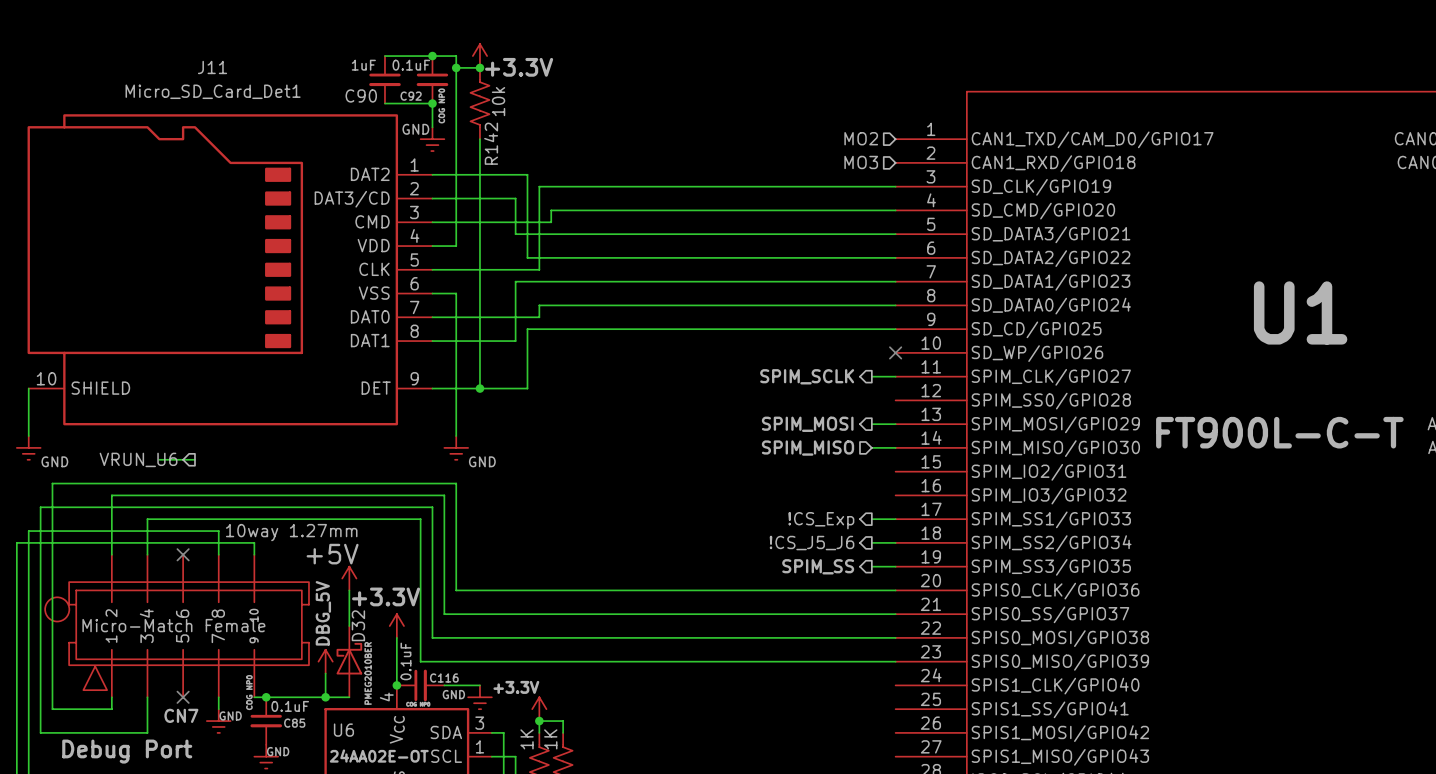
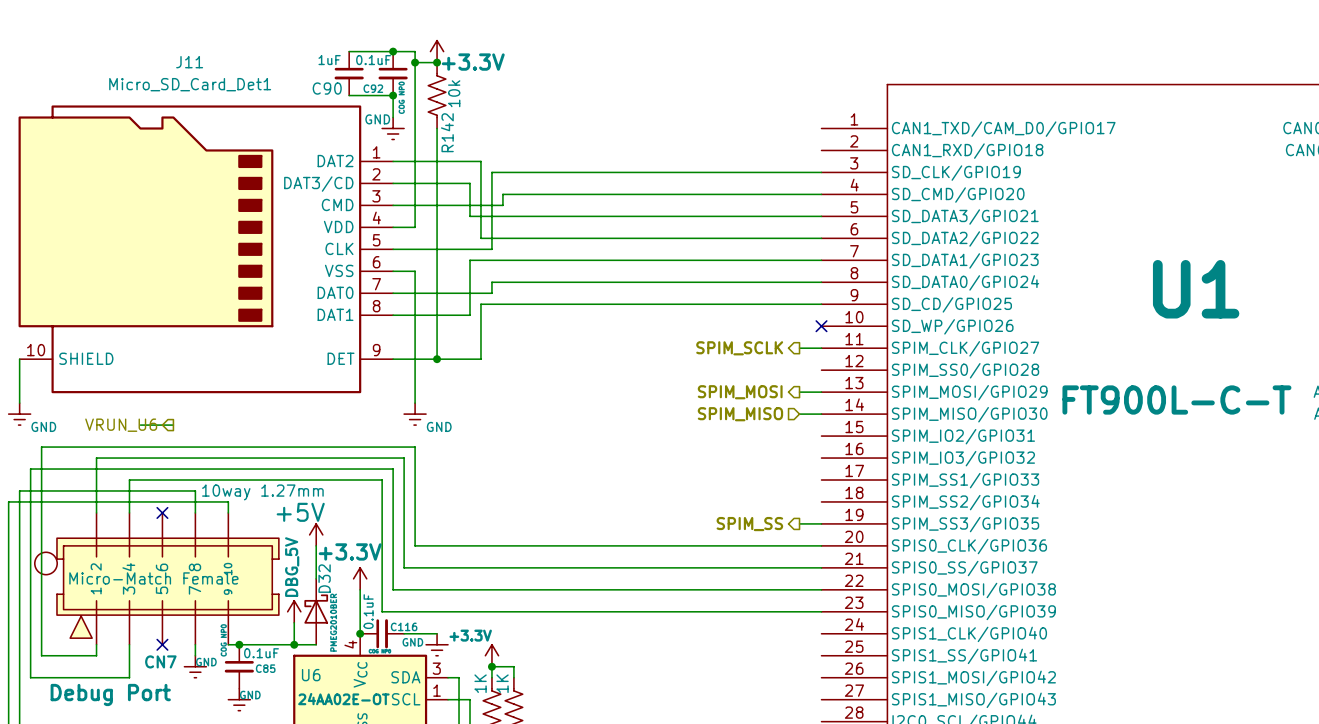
hierarchical label: MO2 (861, 138) -> none
hierarchical label: MO3 (861, 162) -> none
wire: (871, 519) (895, 519) -> none
hierarchical label: !CS_Exp (821, 520) -> none
wire: (871, 542) (895, 542) -> none
hierarchical label: !CS_J5_J6 (812, 543) -> none

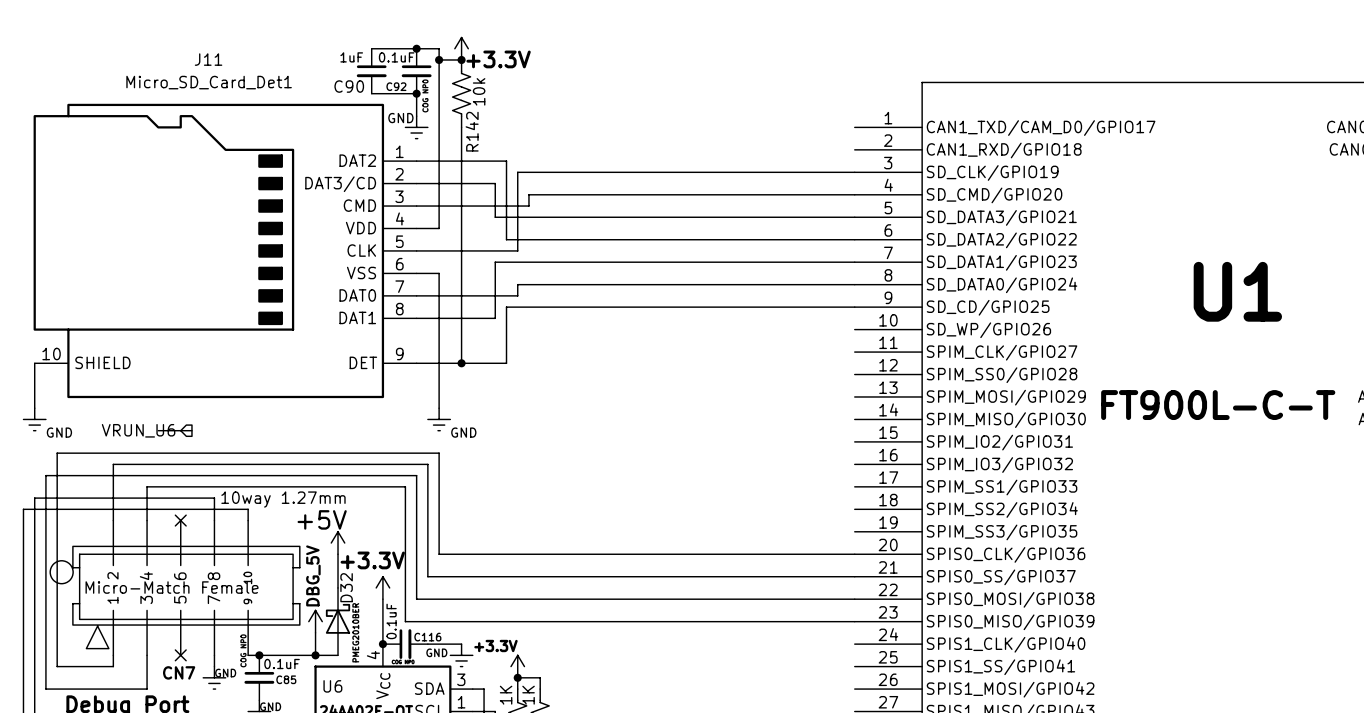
no-connect mark: (821, 326) -> none
hierarchical label: SPIM_SCLK (739, 348) -> none
wire: (799, 348) (821, 348) -> none
hierarchical label: SPIM_MOSI (740, 392) -> none
wire: (799, 392) (821, 392) -> none
hierarchical label: SPIM_MISO (740, 414) -> none
wire: (799, 414) (821, 414) -> none
wire: (799, 523) (821, 523) -> none
hierarchical label: SPIM_SS (749, 524) -> none

